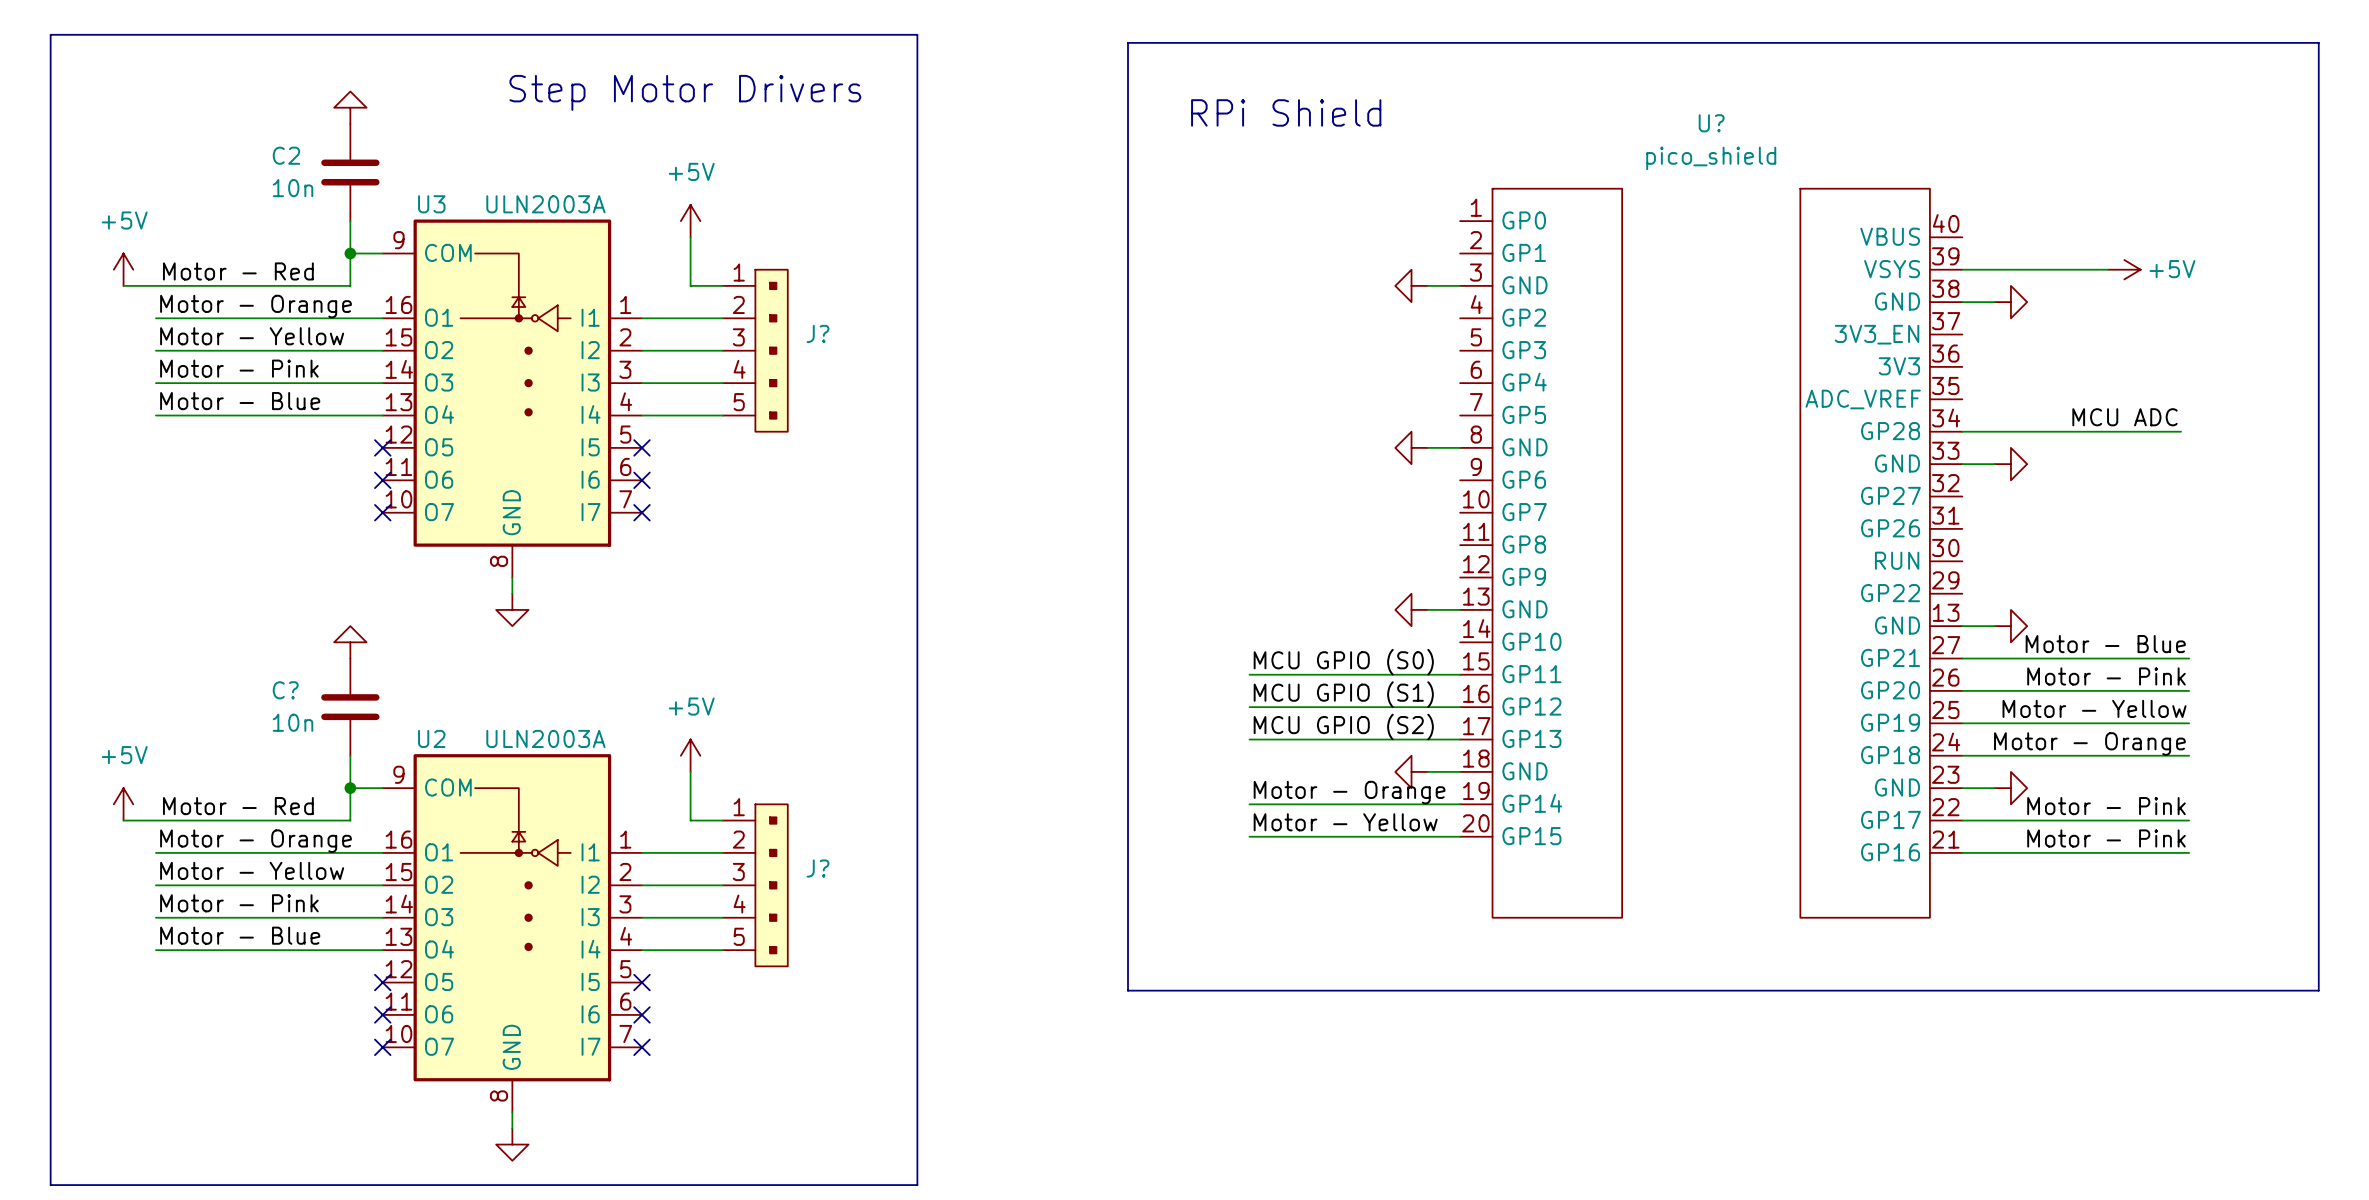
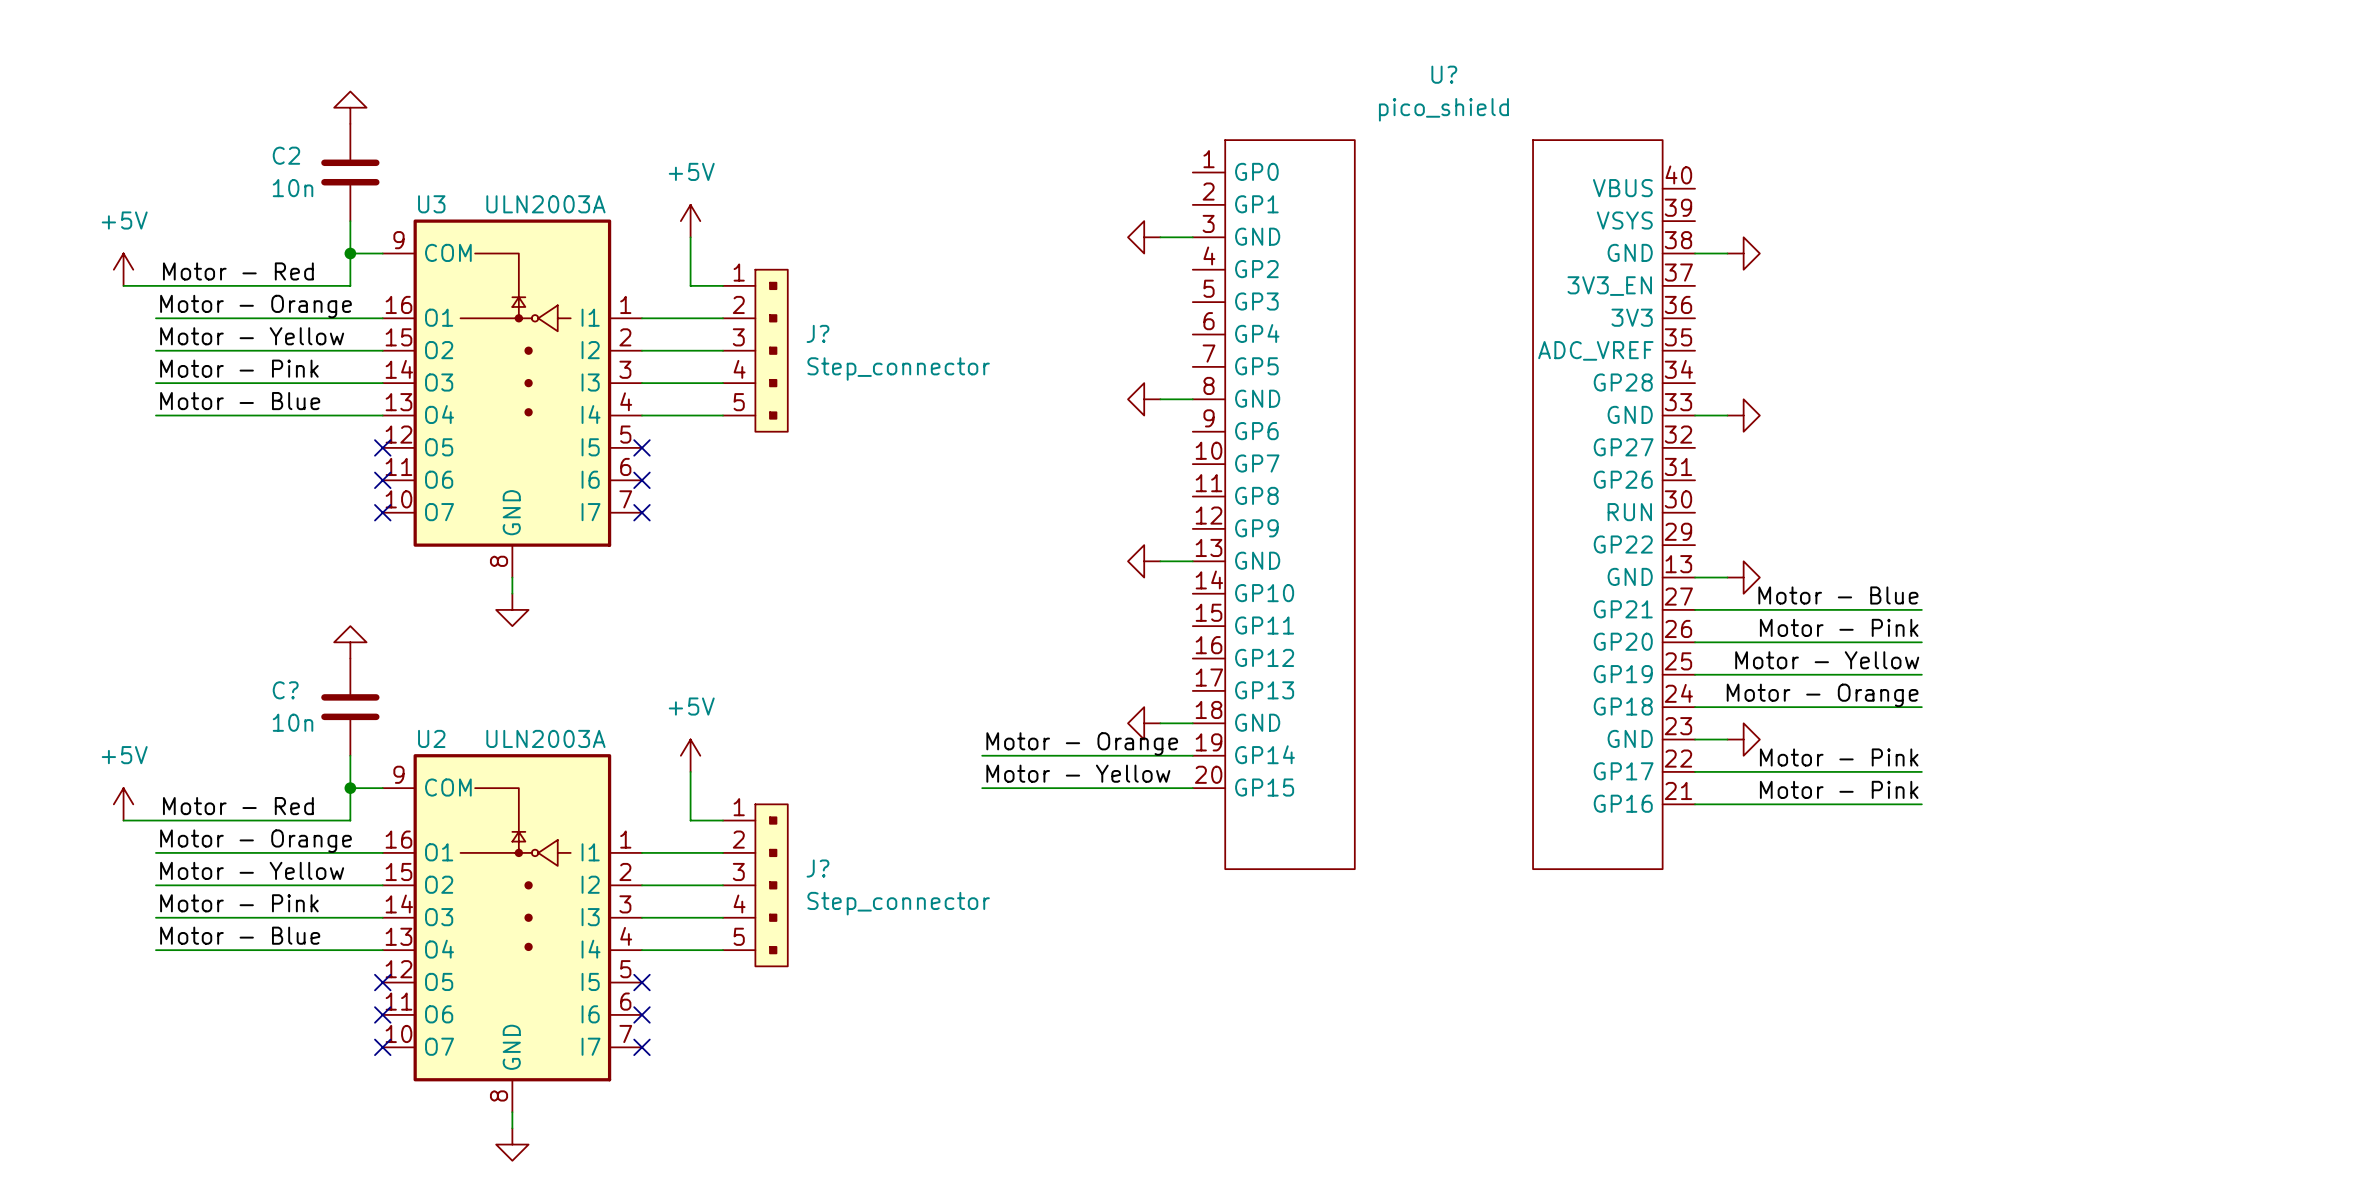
line: (50, 34) (50, 1185) (917, 1185) (917, 34) (50, 34) -> none
line: (1128, 42) (2318, 42) (2318, 990) (1128, 990) (1128, 42) -> none
text: Step Motor Drivers (685, 92) -> none
text: RPi Shield (1286, 112) -> none
power symbol: none -> (1144, 237)
power symbol: none -> (1743, 253)
wire: (1962, 269) (2108, 269) -> none
power symbol: +5V (2124, 269) -> none
power symbol: (1411, 285) -> none
wire: (1427, 285) (1460, 285) -> (1160, 237) (1192, 237)
wire: (1962, 302) (1994, 302) -> (1695, 253) (1727, 253)
power symbol: (2010, 302) -> none
J? value: none -> Step_connector (898, 369)
power symbol: none -> (1144, 399)
power symbol: none -> (1743, 415)
label: MCU ADC (2125, 417) -> none
wire: (1962, 431) (2181, 431) -> none
power symbol: (1411, 447) -> none
wire: (1427, 447) (1460, 447) -> (1160, 399) (1192, 399)
wire: (1962, 464) (1994, 464) -> (1695, 415) (1727, 415)
power symbol: (2010, 464) -> none
U? position: (1711, 553) -> (1443, 504)
power symbol: none -> (1144, 561)
power symbol: none -> (1743, 577)
power symbol: (1411, 609) -> none
wire: (1427, 609) (1460, 609) -> (1160, 561) (1192, 561)
wire: (1962, 626) (1994, 626) -> (1695, 577) (1727, 577)
power symbol: (2010, 626) -> none
label: none -> Motor - Pink (1839, 627)
label position: Motor - Blue (2105, 644) -> Motor - Blue (1838, 595)
wire: (1962, 658) (2189, 658) -> (1695, 609) (1921, 609)
label: MCU GPIO (S0) (1343, 662) -> none
wire: (1249, 674) (1460, 674) -> none
label: Motor - Pink (2106, 676) -> none
wire: (1962, 690) (2189, 690) -> (1695, 642) (1921, 642)
label: MCU GPIO (S1) (1343, 694) -> none
wire: (1249, 707) (1460, 707) -> none
label position: Motor - Yellow (2094, 708) -> Motor - Yellow (1827, 660)
power symbol: none -> (1144, 723)
wire: (1962, 723) (2189, 723) -> (1695, 674) (1921, 674)
label: MCU GPIO (S2) (1343, 727) -> none
wire: (1249, 739) (1460, 739) -> none
power symbol: none -> (1743, 739)
label position: Motor - Orange (2089, 743) -> Motor - Orange (1822, 695)
wire: (1962, 755) (2189, 755) -> (1695, 707) (1921, 707)
label: none -> Motor - Pink (1839, 757)
power symbol: (1411, 771) -> none
wire: (1427, 771) (1460, 771) -> (1160, 723) (1192, 723)
wire: (1962, 788) (1994, 788) -> (1695, 739) (1727, 739)
power symbol: (2010, 788) -> none
label: none -> Motor - Pink (1839, 789)
label position: Motor - Orange (1349, 792) -> Motor - Orange (1082, 743)
wire: (1249, 804) (1460, 804) -> (982, 755) (1192, 755)
label: Motor - Pink (2106, 806) -> none
wire: (1962, 820) (2189, 820) -> (1695, 771) (1921, 771)
label position: Motor - Yellow (1345, 822) -> Motor - Yellow (1078, 773)
wire: (1249, 836) (1460, 836) -> (982, 788) (1192, 788)
label: Motor - Pink (2106, 838) -> none
wire: (1962, 852) (2189, 852) -> (1695, 804) (1921, 804)
J? value: none -> Step_connector (898, 903)

